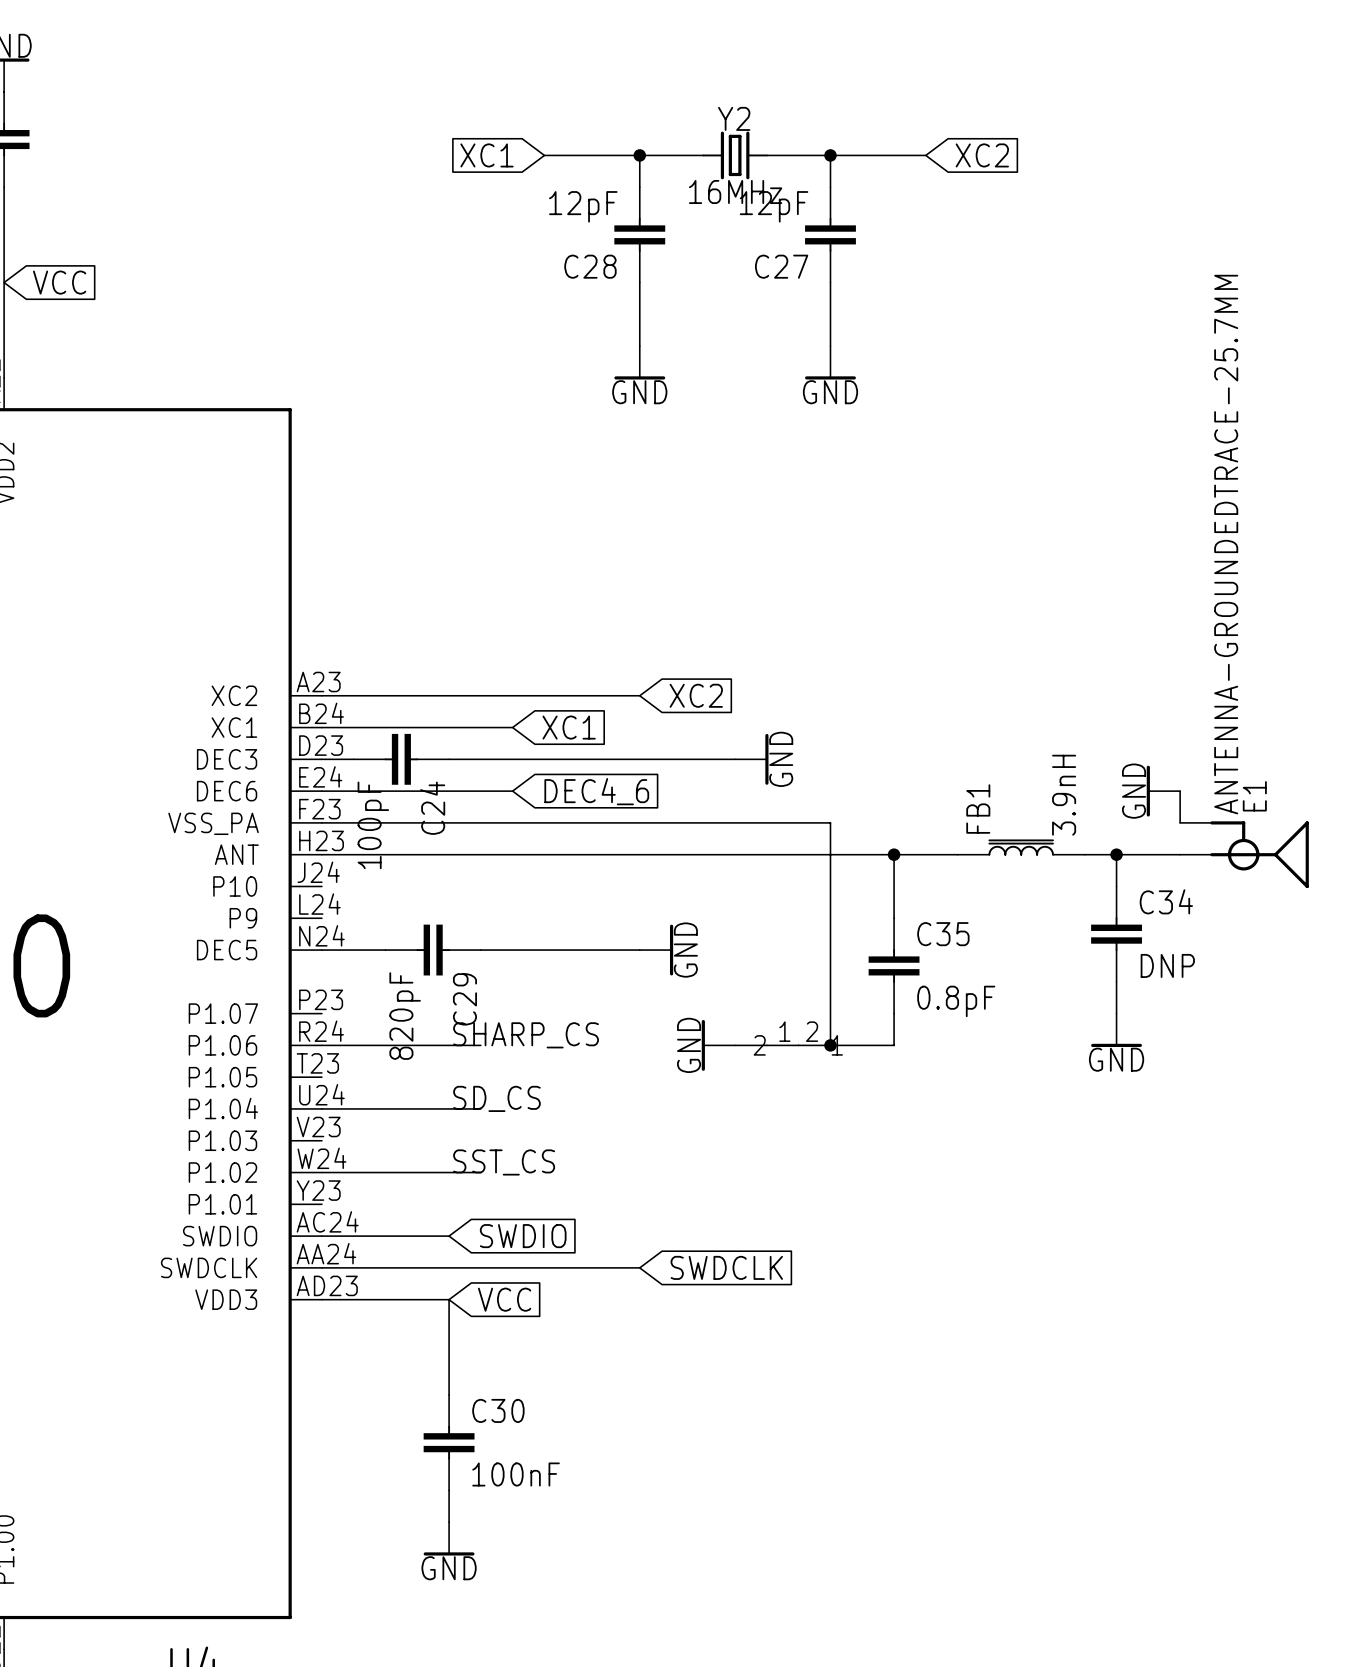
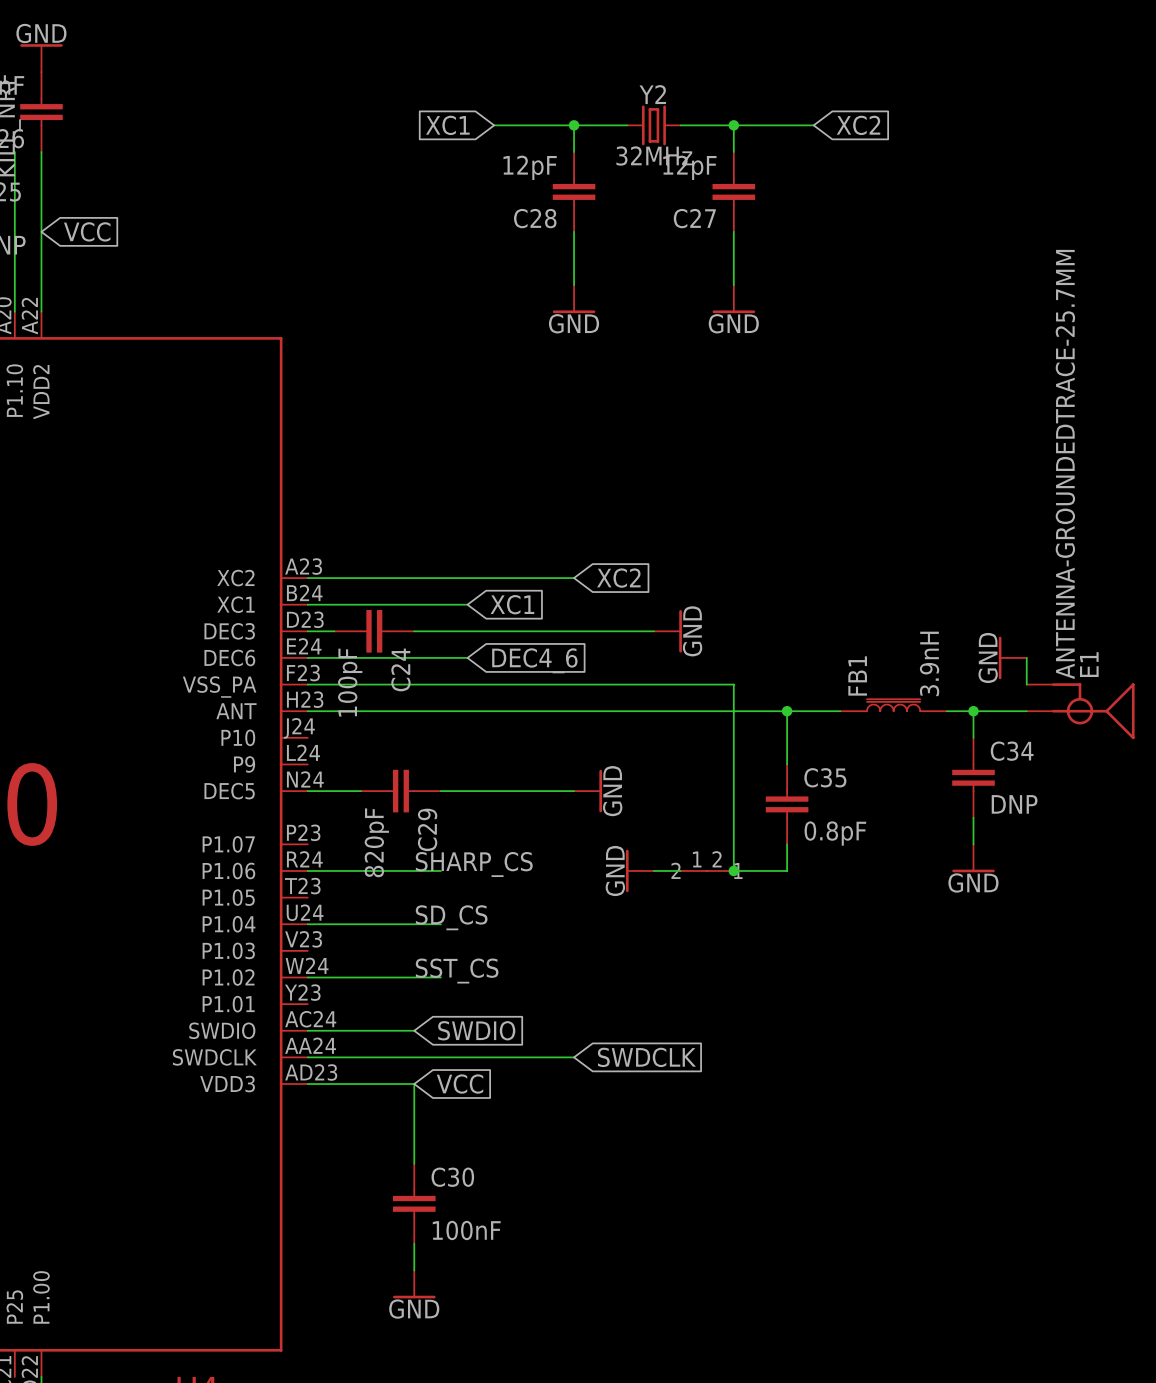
Y2 value: 16MHz (735, 191) -> 32MHz (654, 156)

